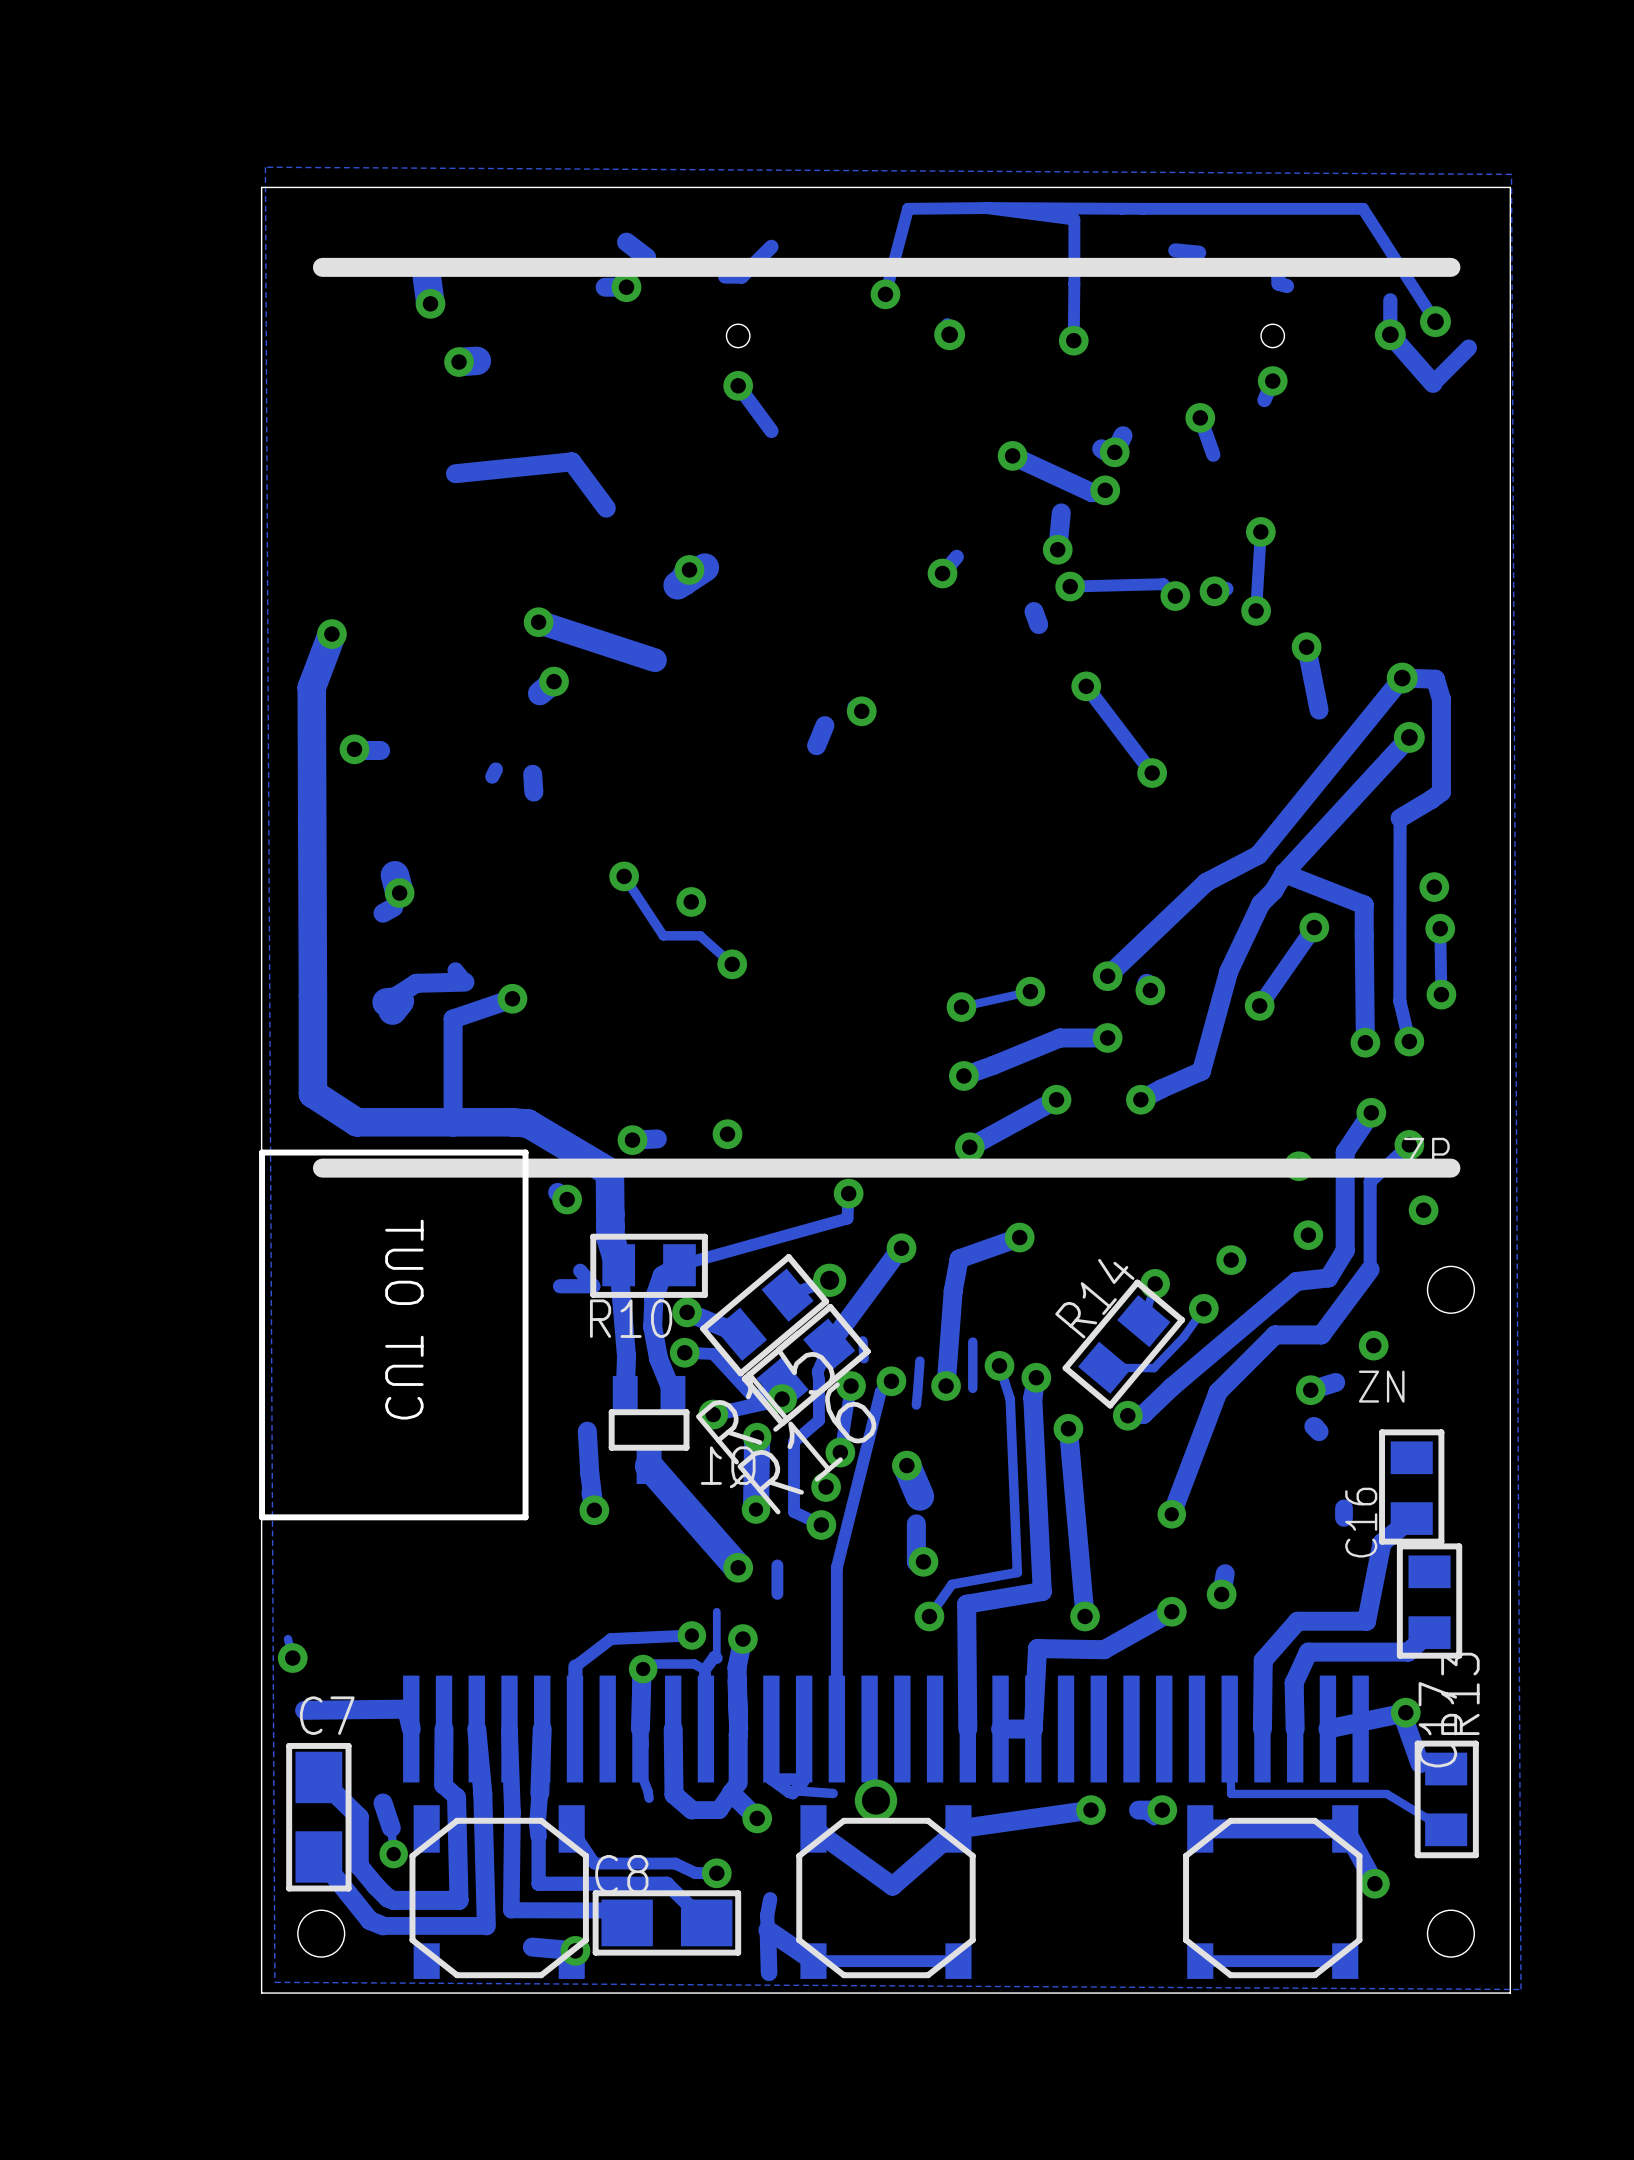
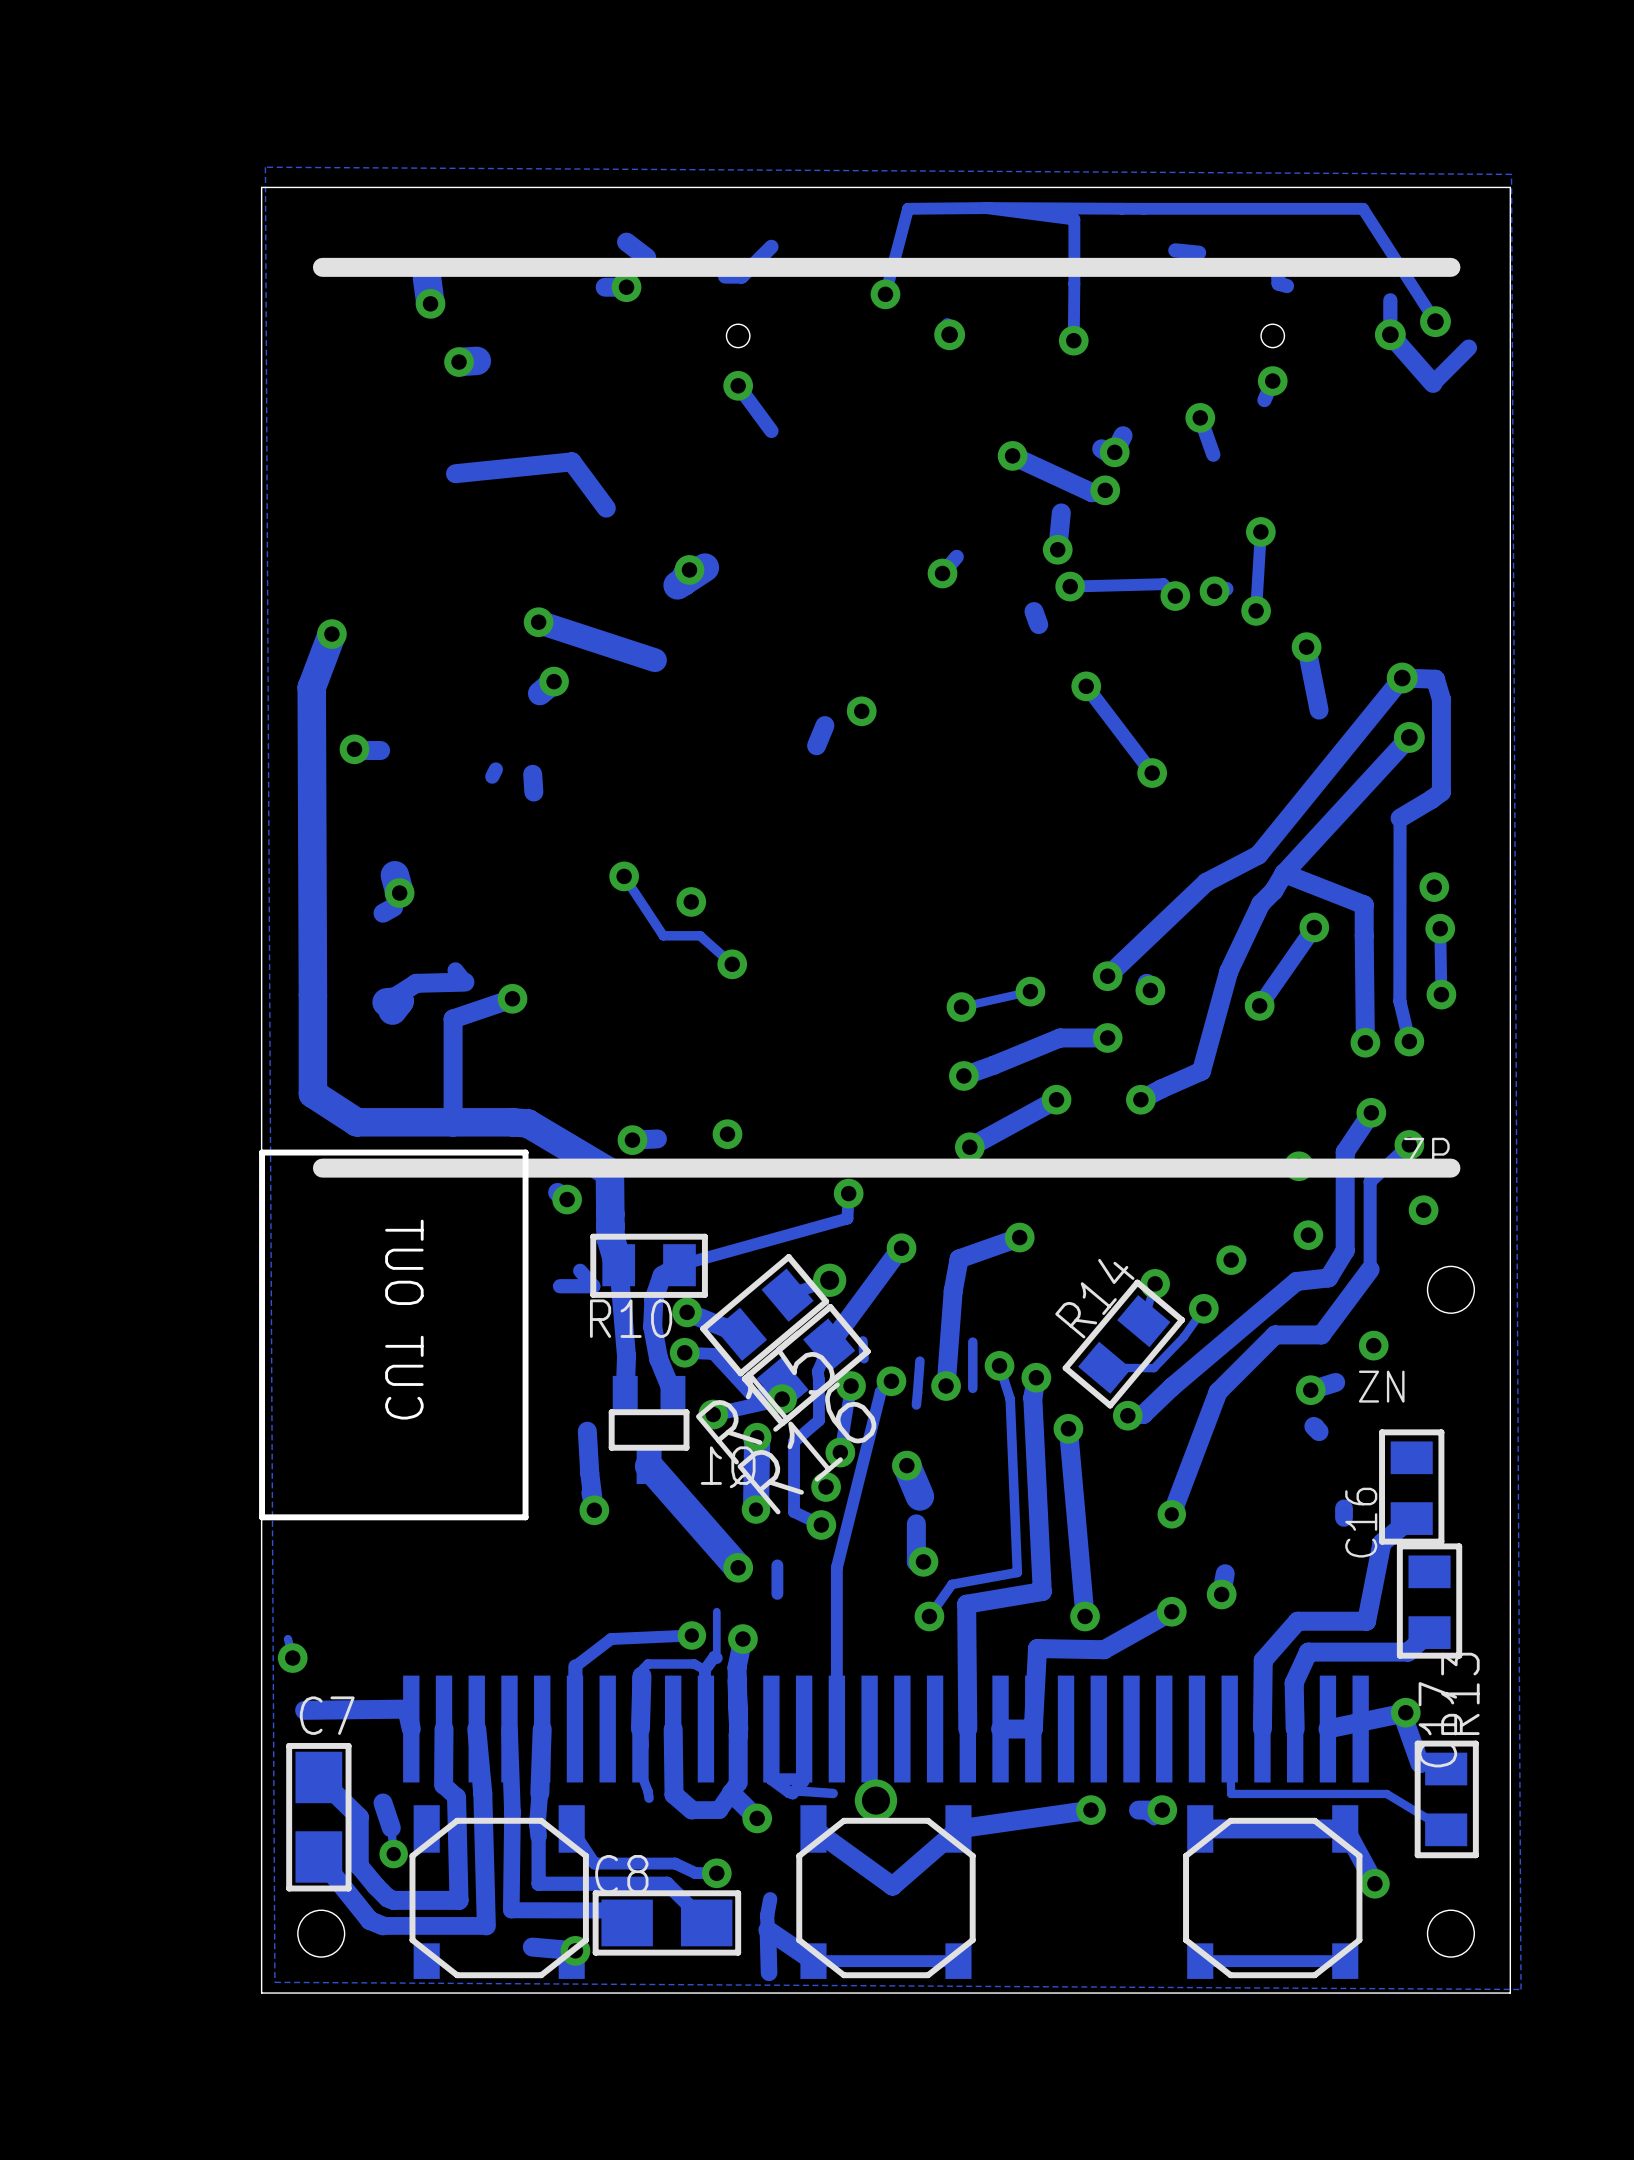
via: (643, 1669) -> none

